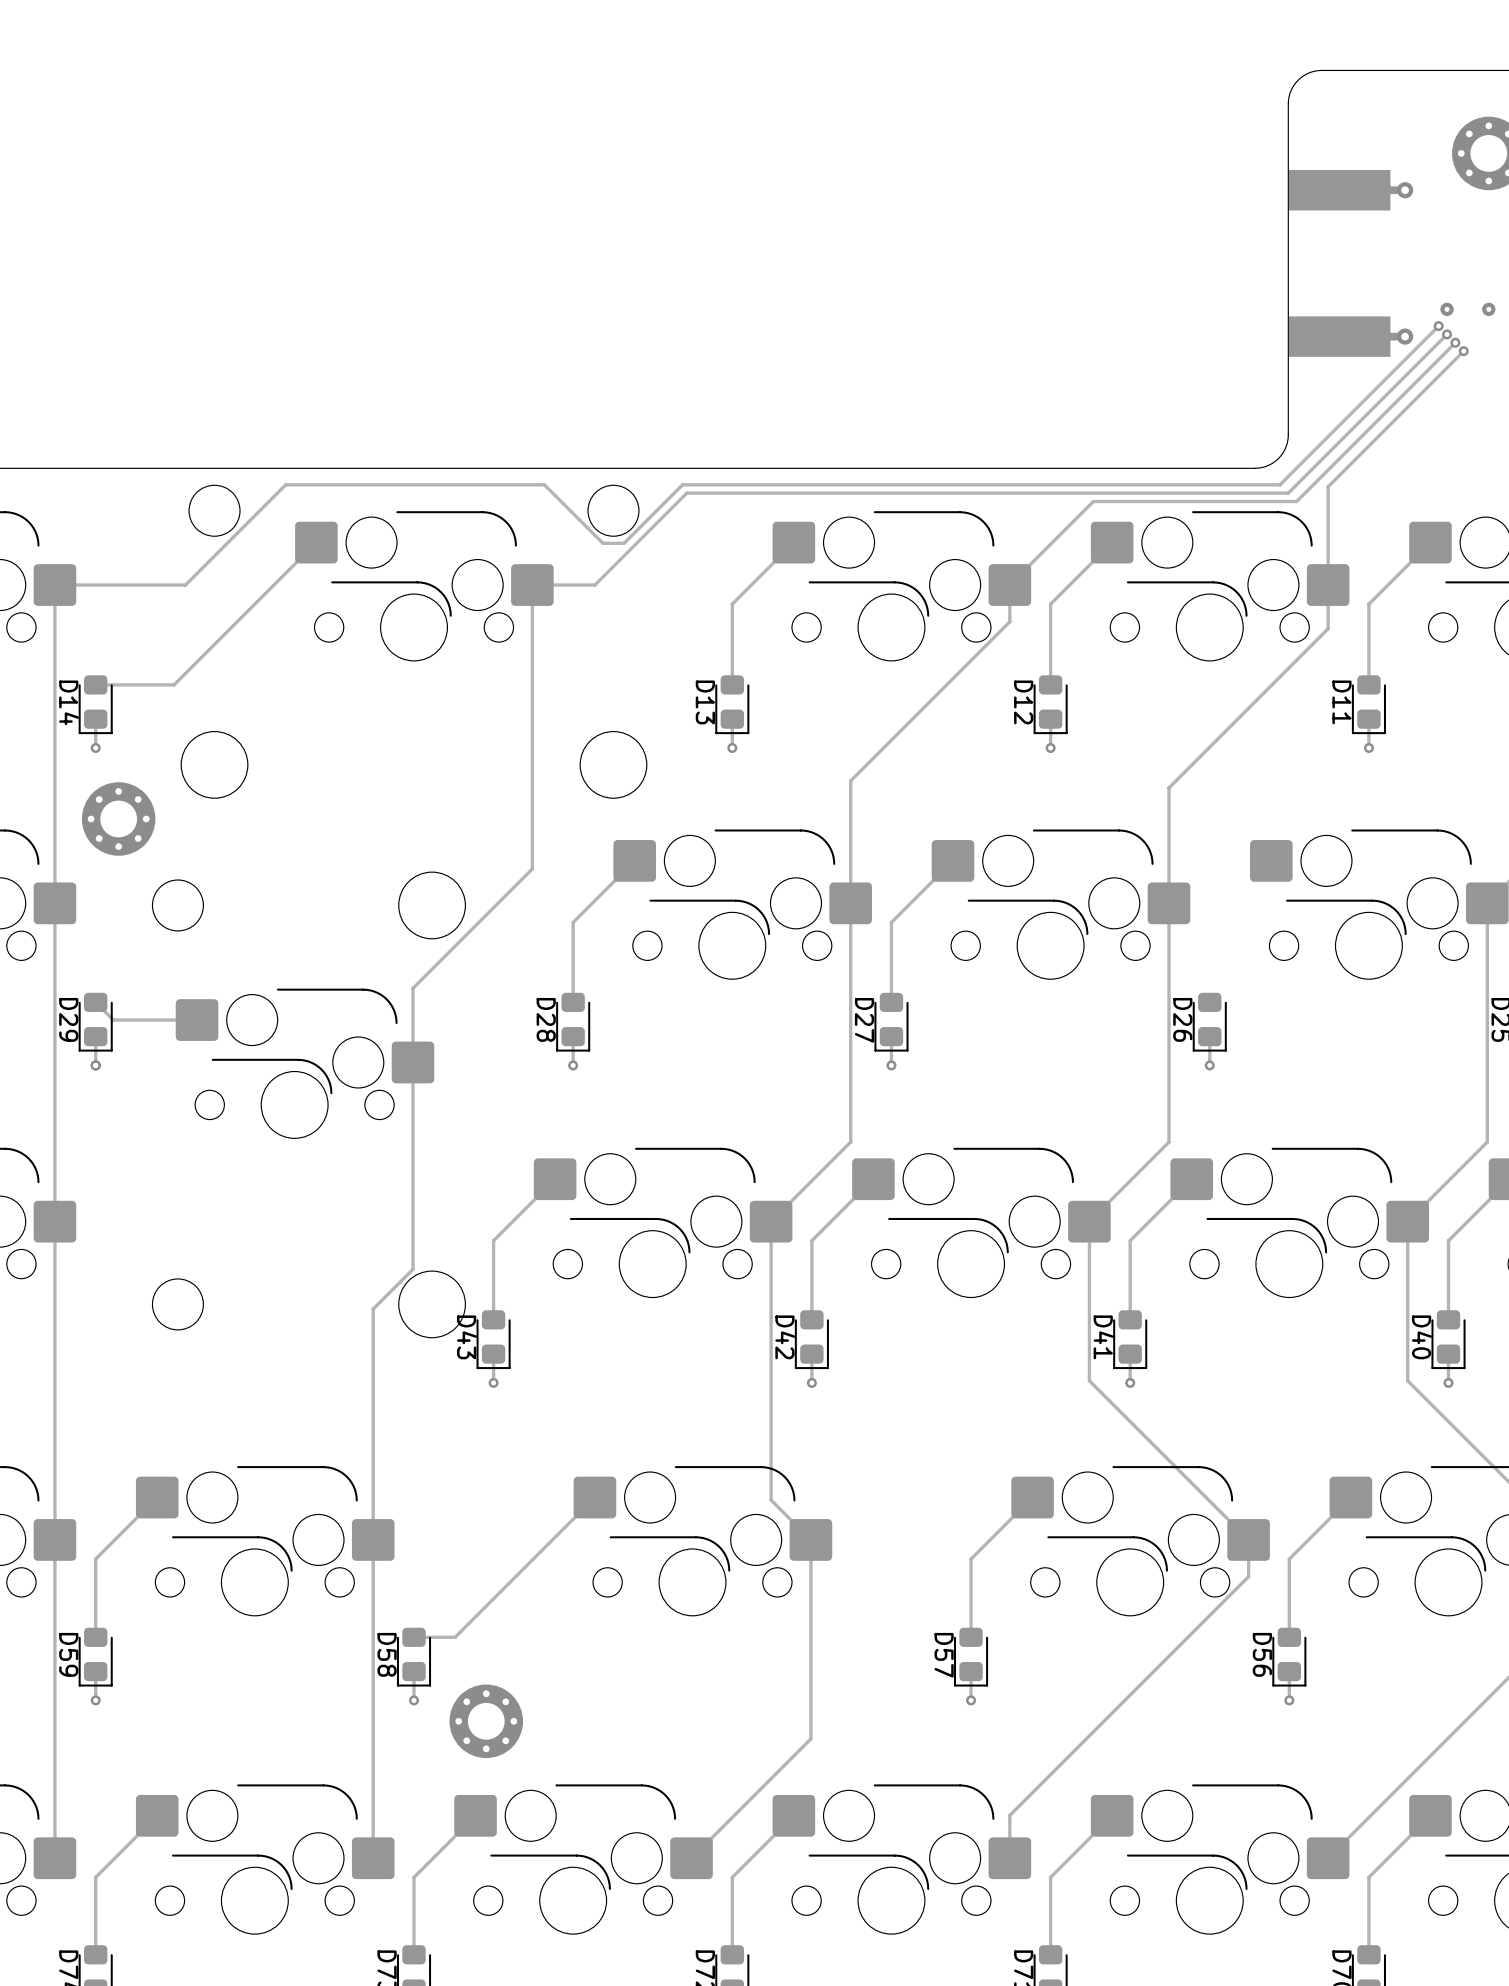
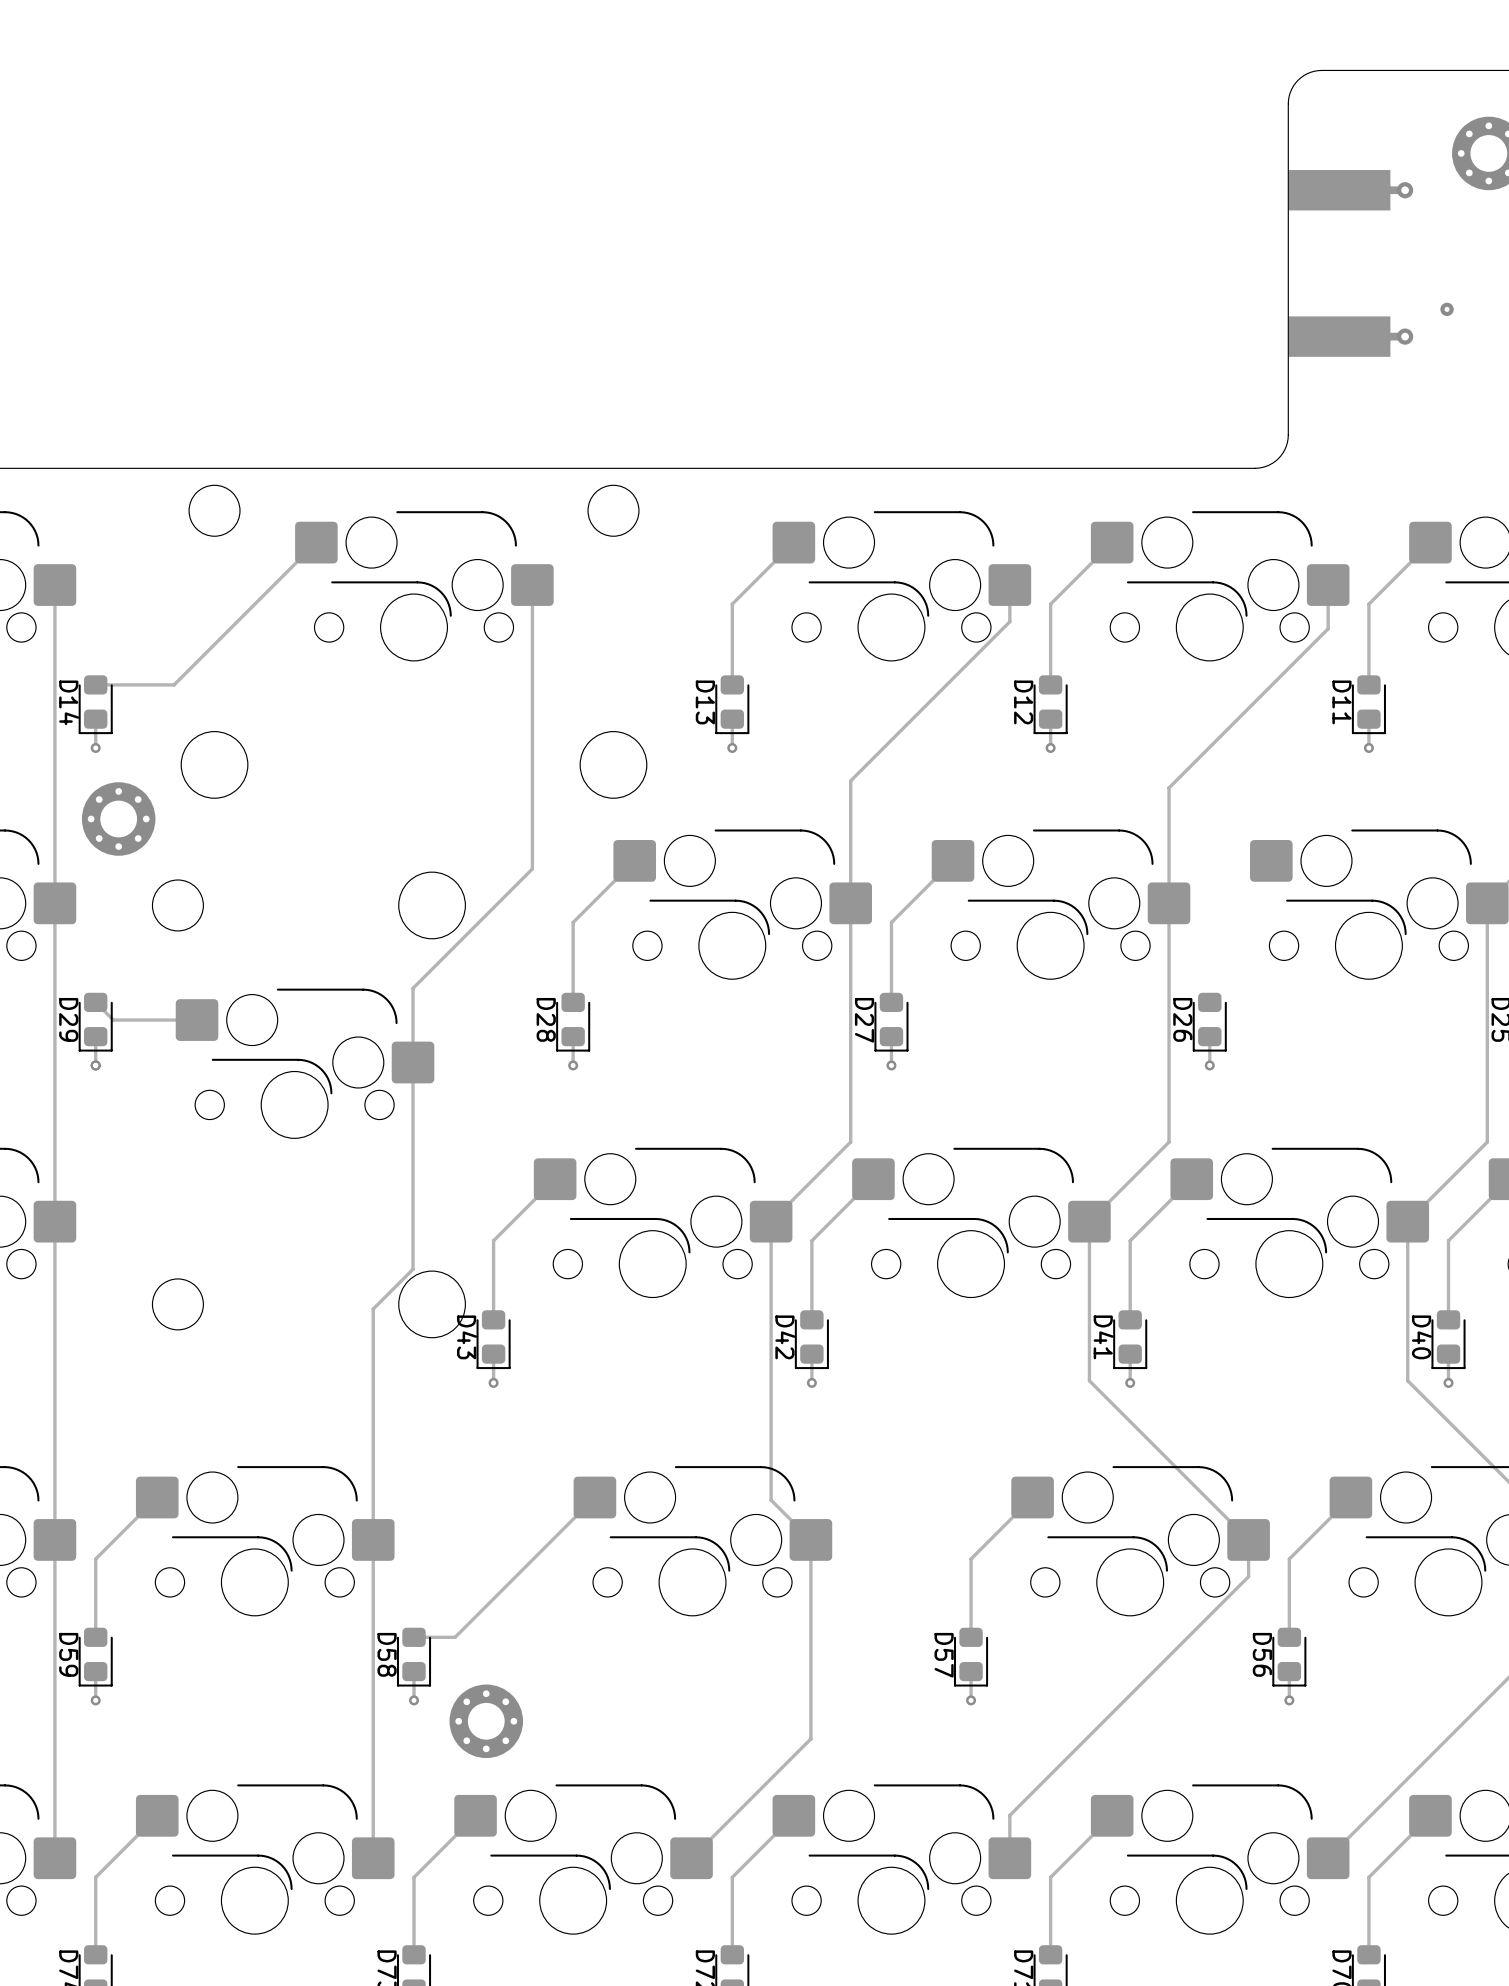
via: (1488, 309) -> none
track: (1438, 326) (1279, 484) (682, 484) (624, 543) (602, 543) (544, 484) (285, 484) (185, 585) (54, 585) (56, 585) -> none
via: (1438, 326) -> none
track: (1447, 334) (1288, 493) (686, 493) (594, 585) (532, 585) -> none
via: (1447, 334) -> none
track: (1455, 342) (1296, 501) (1093, 501) (1009, 585) -> none
via: (1455, 342) -> none
track: (1463, 351) (1328, 486) (1328, 585) -> none
via: (1463, 351) -> none

